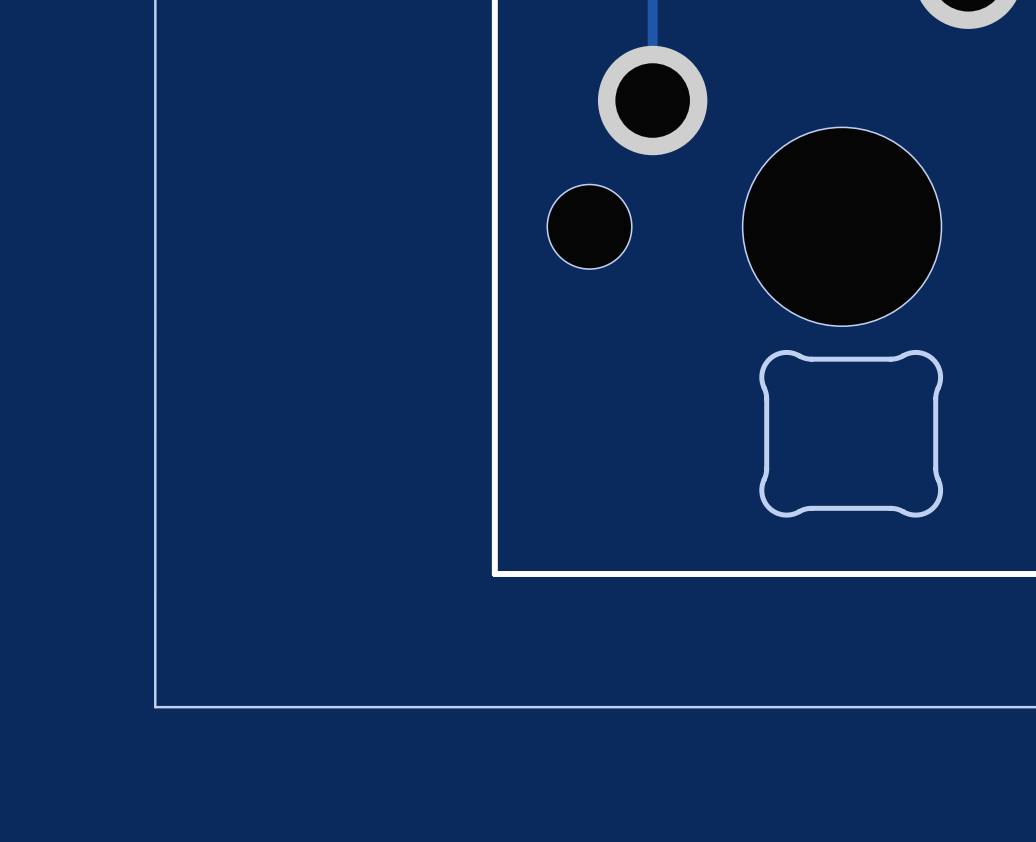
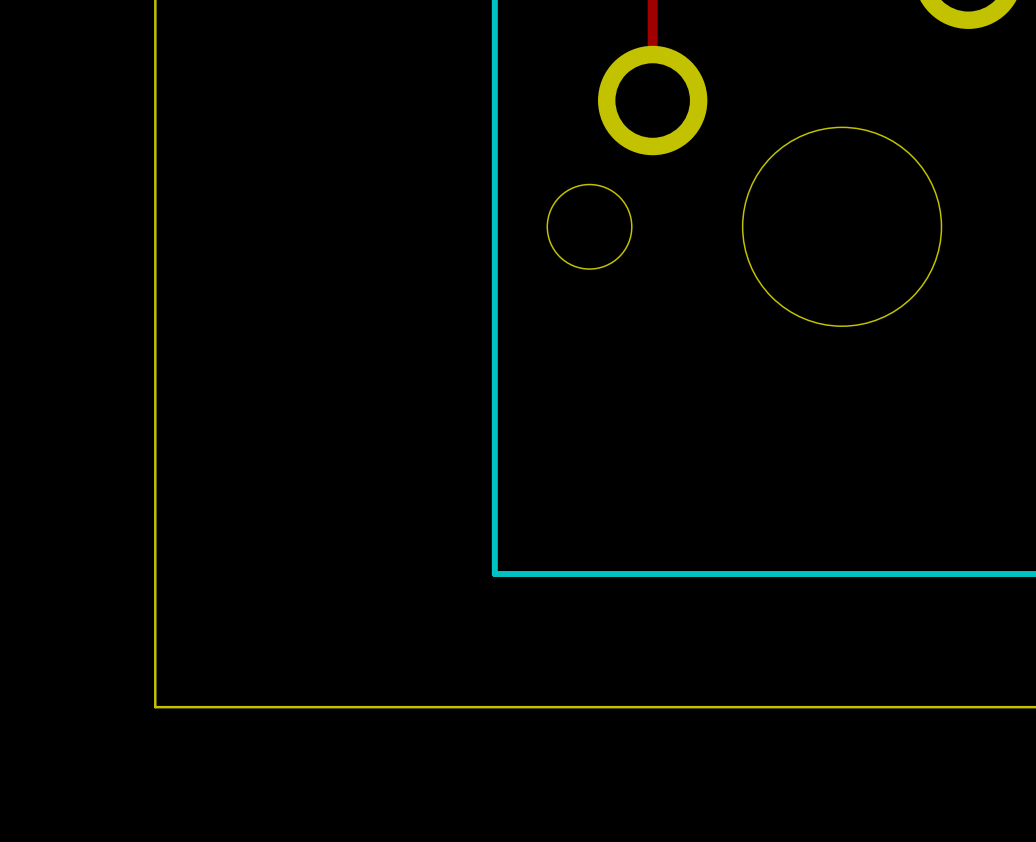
part: (851, 433) -> none

